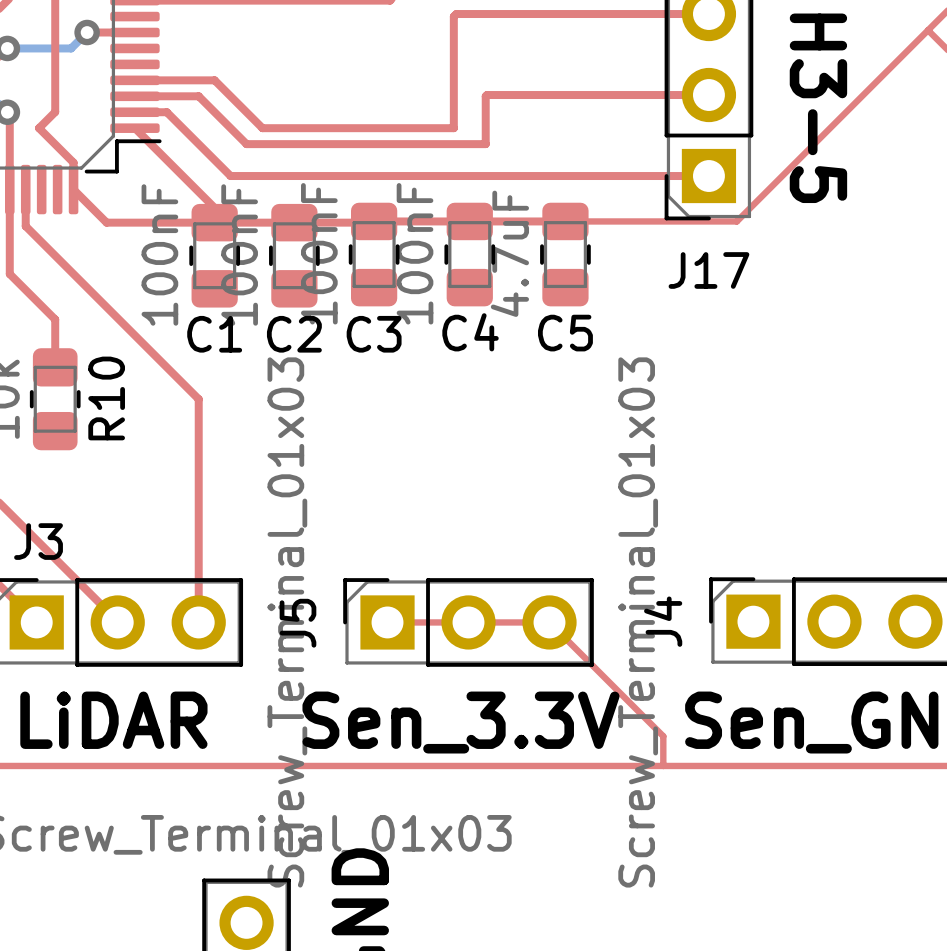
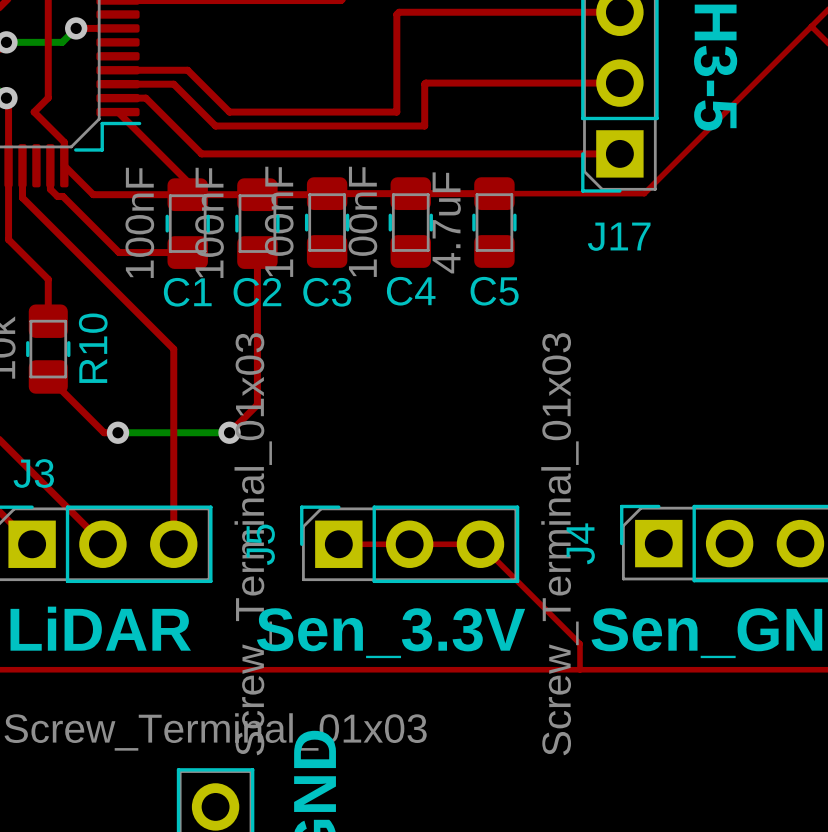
top track: none -> (50, 165) (50, 189) (57, 196) (62, 196) (119, 252) (187, 252)
top track: none -> (257, 252) (257, 404) (229, 432)
top track: none -> (48, 376) (104, 432) (117, 432)
bottom track: none -> (117, 432) (229, 432)
via: none -> (117, 432)
via: none -> (229, 432)

